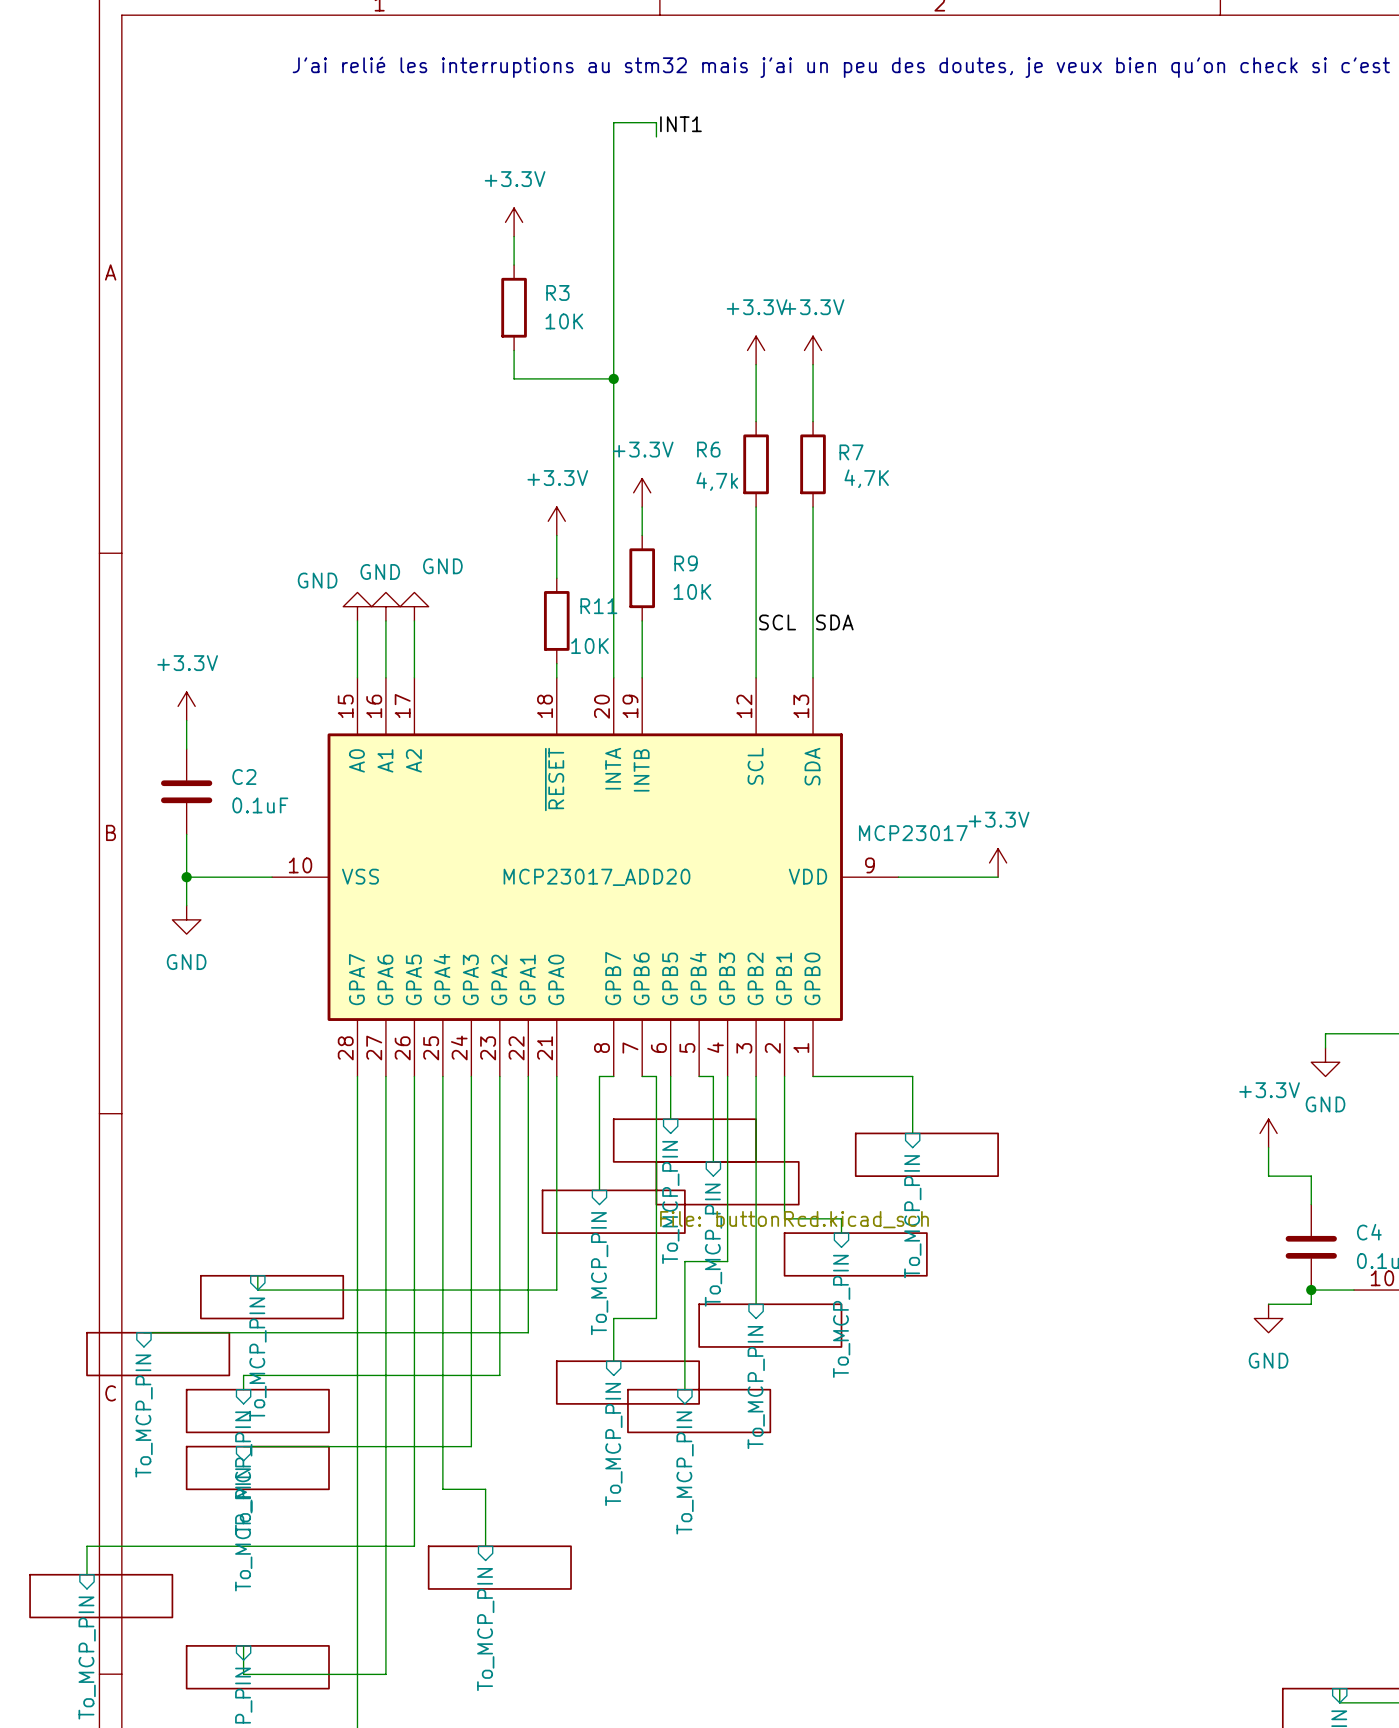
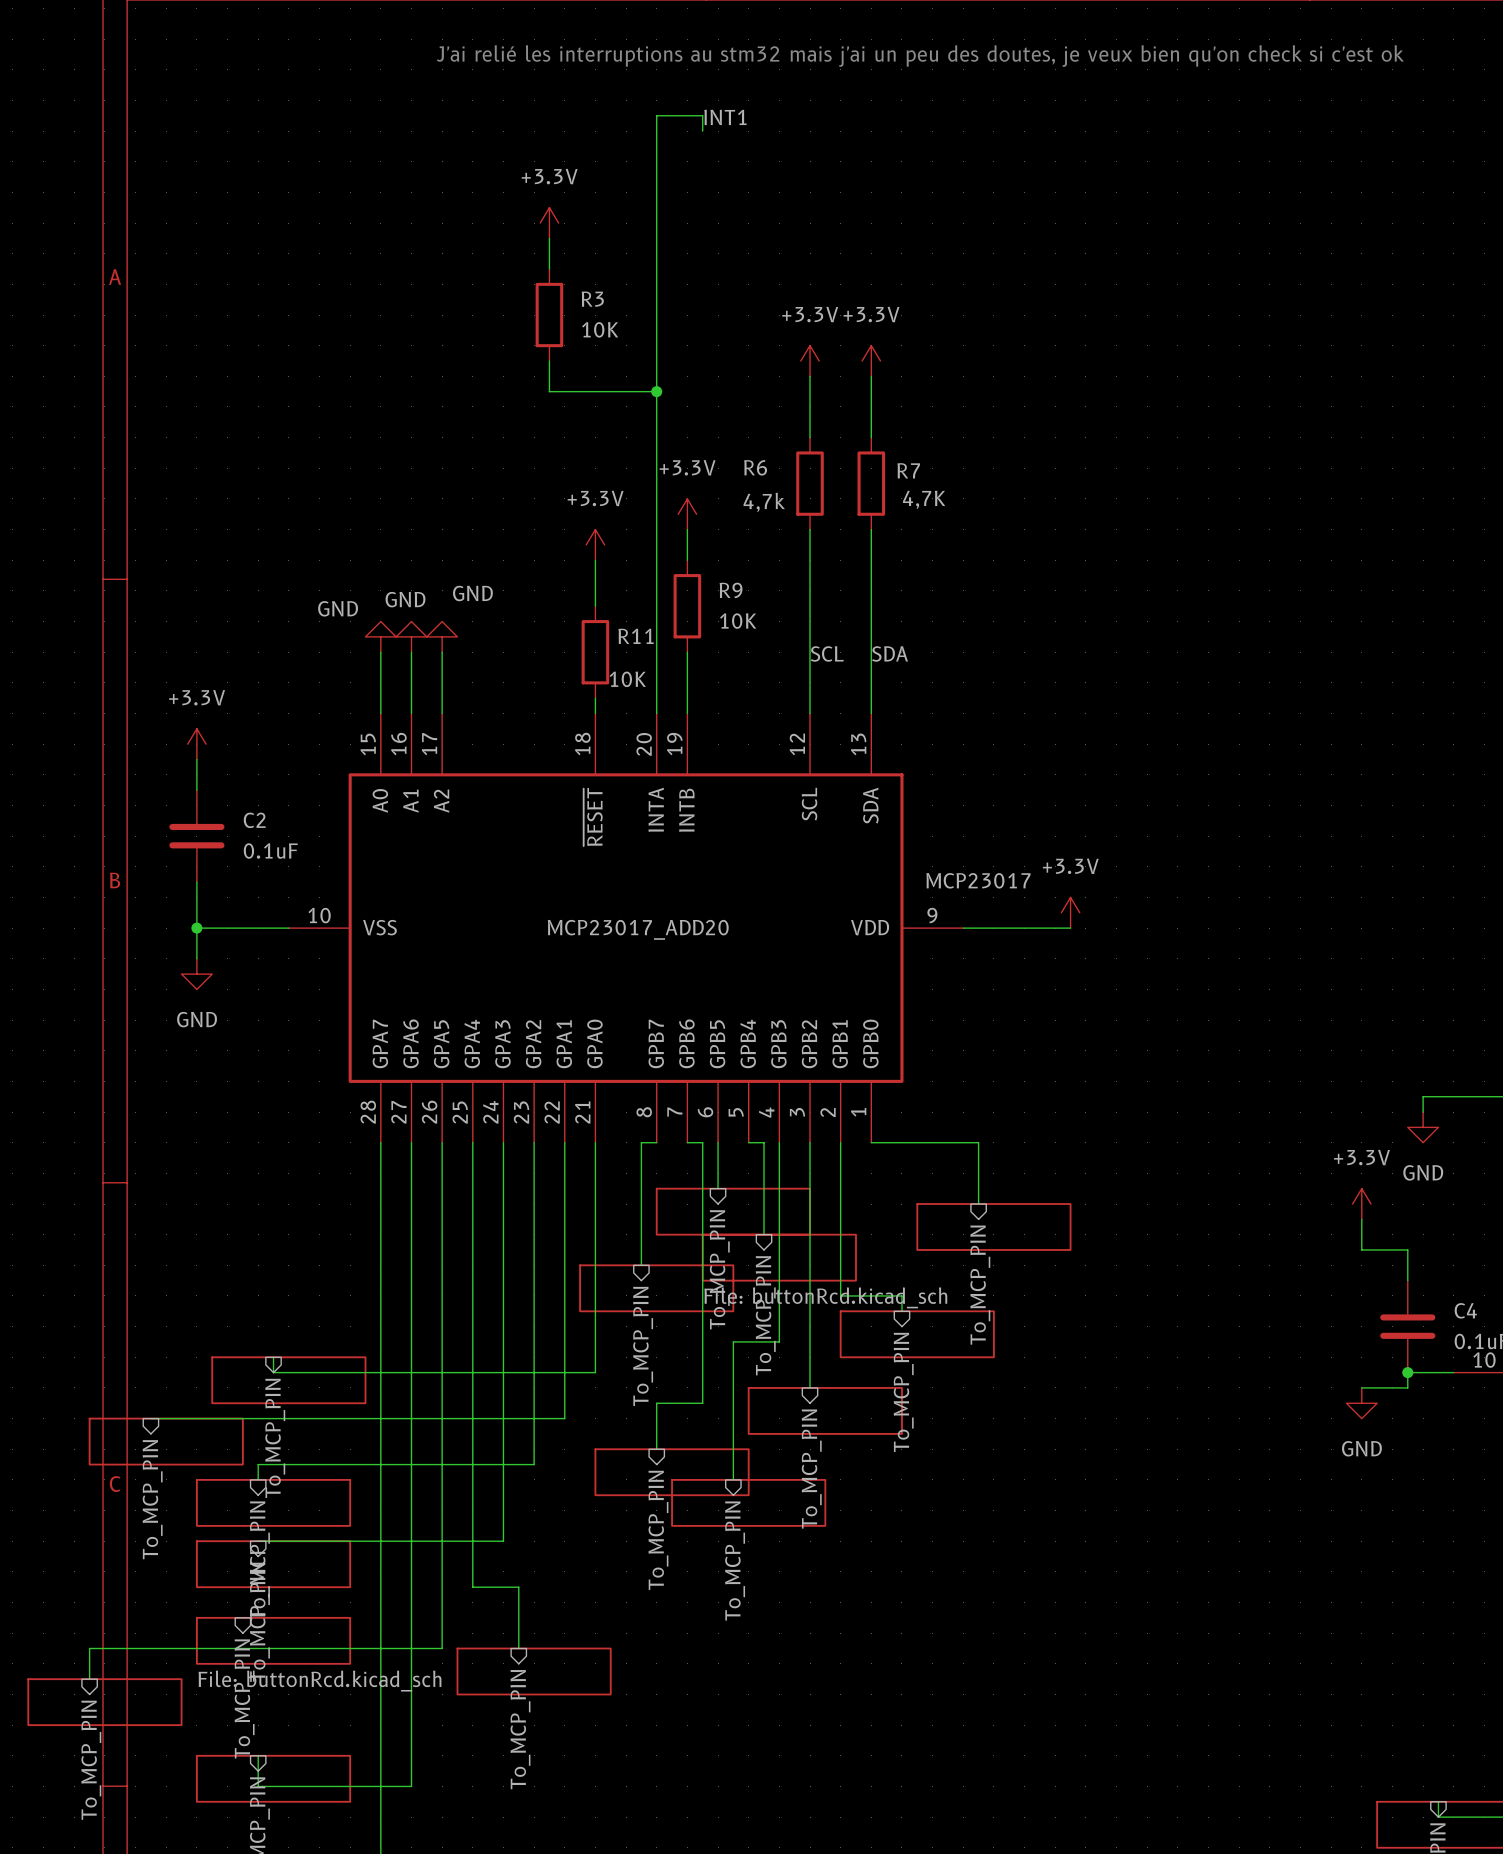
sheet: none -> File: buttonRcd.kicad_sch (273, 1640)
sheet pin: none -> To_MCP_PIN (244, 1698)

